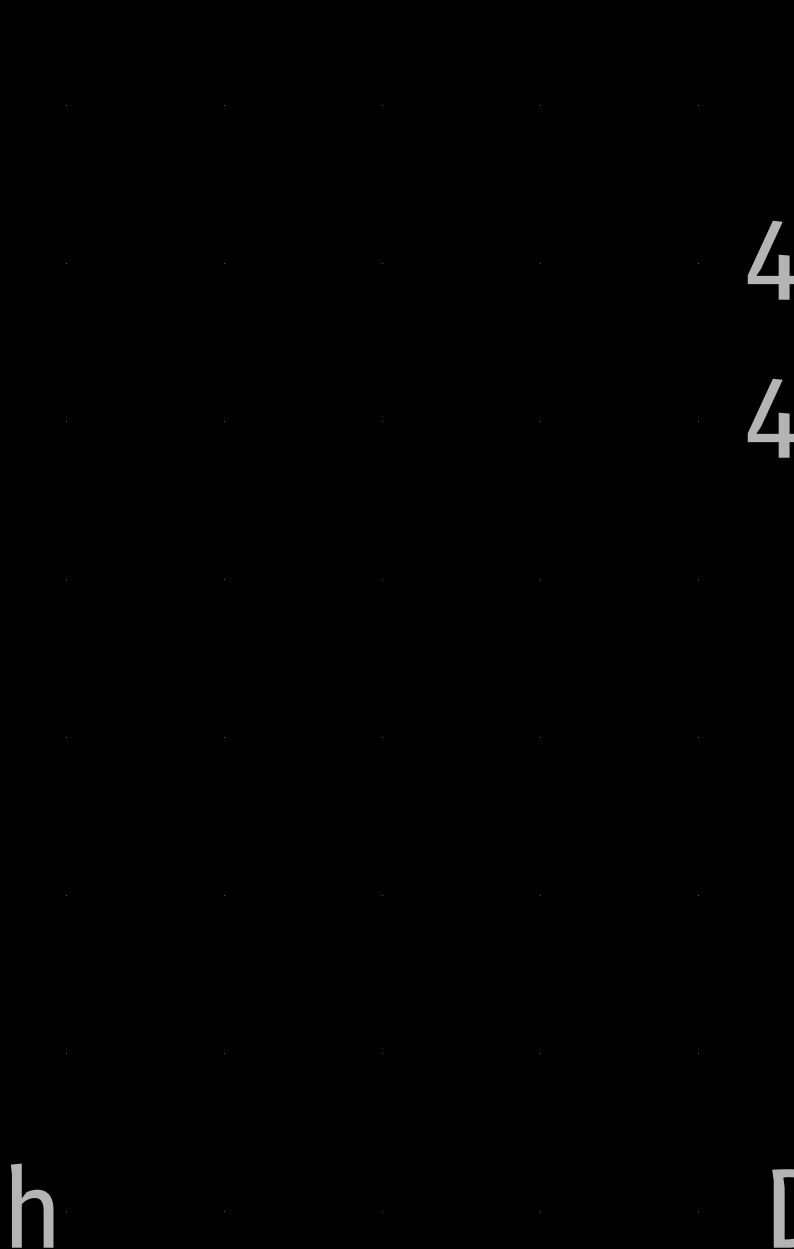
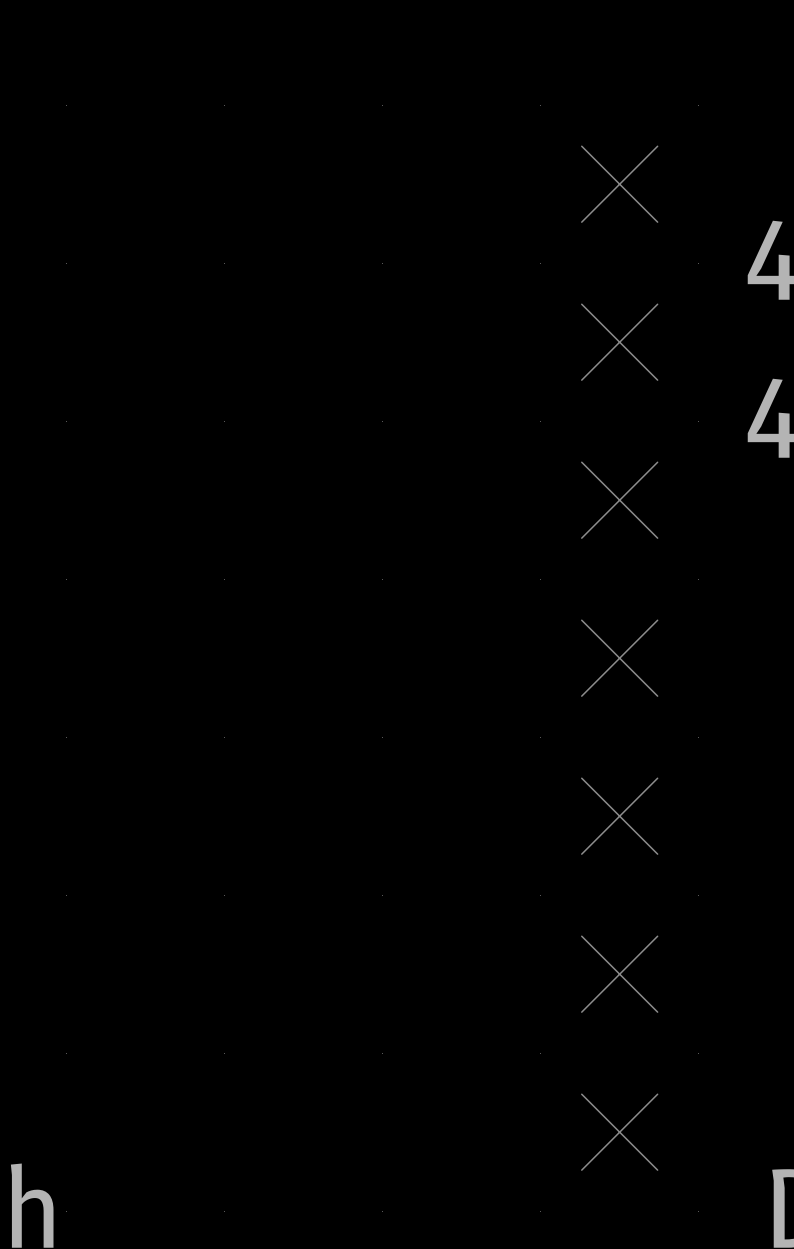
no-connect mark: none -> (619, 184)
no-connect mark: none -> (619, 342)
no-connect mark: none -> (619, 500)
no-connect mark: none -> (619, 658)
no-connect mark: none -> (619, 816)
no-connect mark: none -> (619, 974)
no-connect mark: none -> (619, 1132)

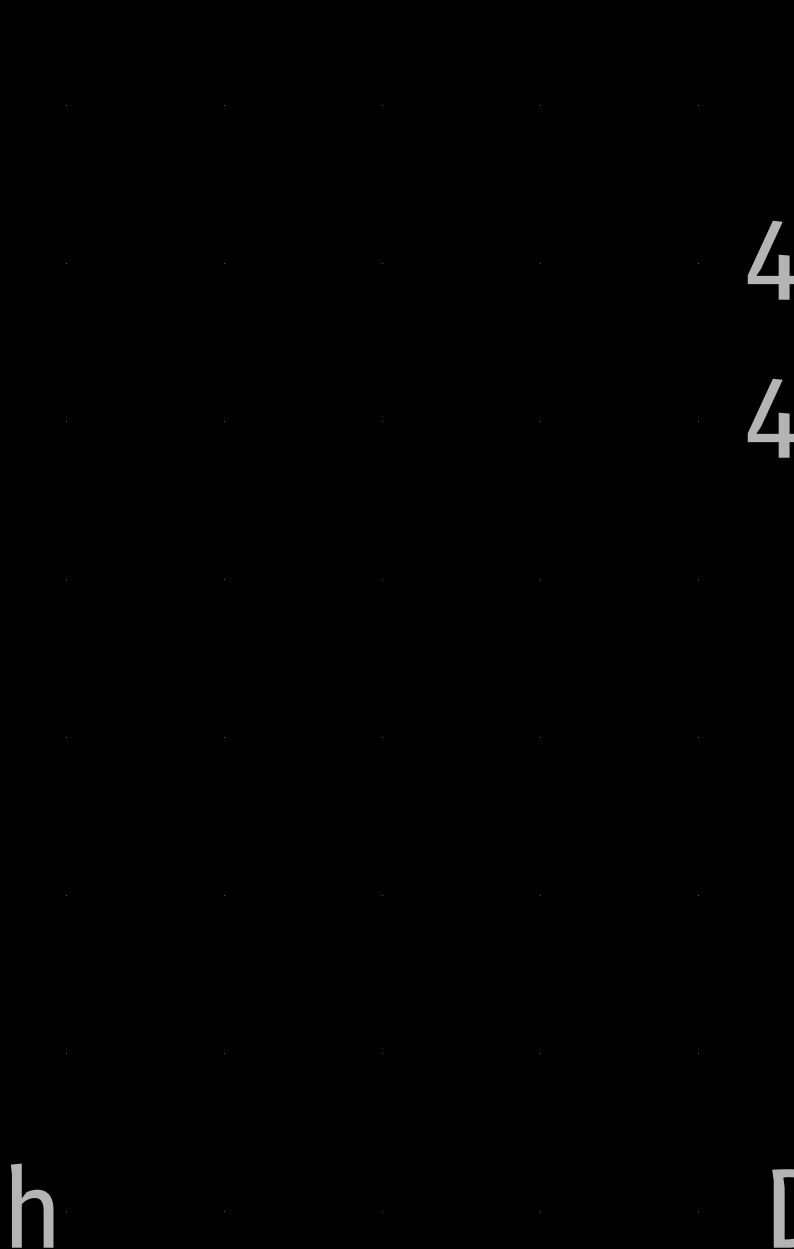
no-connect mark: (619, 184) -> none
no-connect mark: (619, 342) -> none
no-connect mark: (619, 500) -> none
no-connect mark: (619, 658) -> none
no-connect mark: (619, 816) -> none
no-connect mark: (619, 974) -> none
no-connect mark: (619, 1132) -> none

